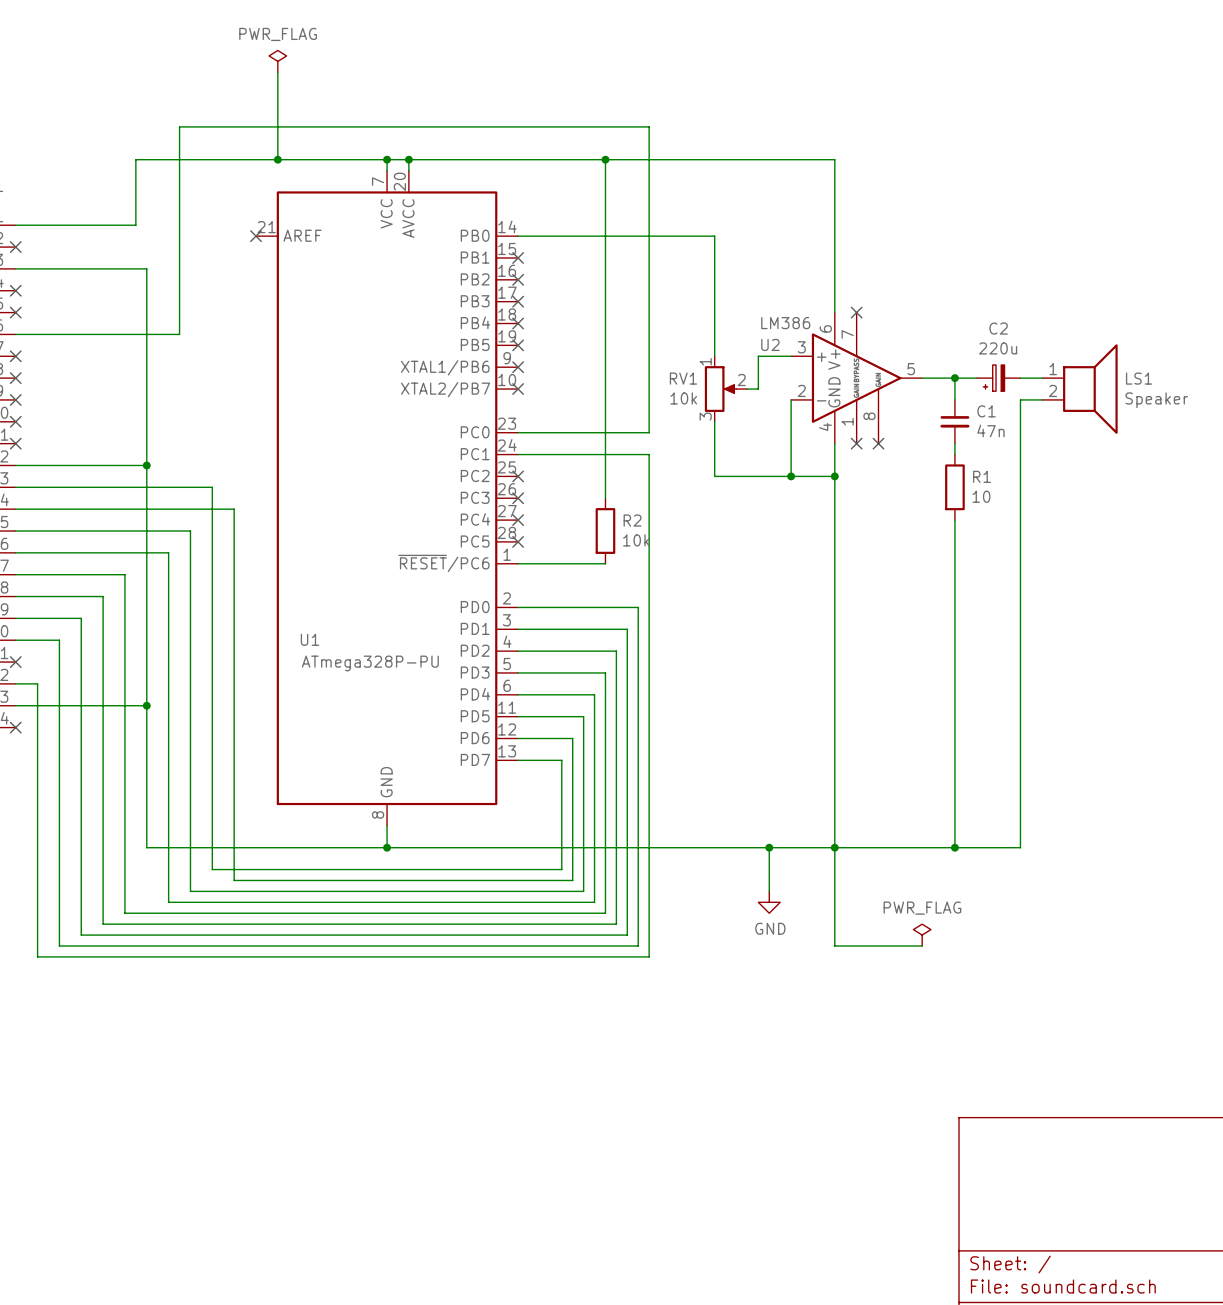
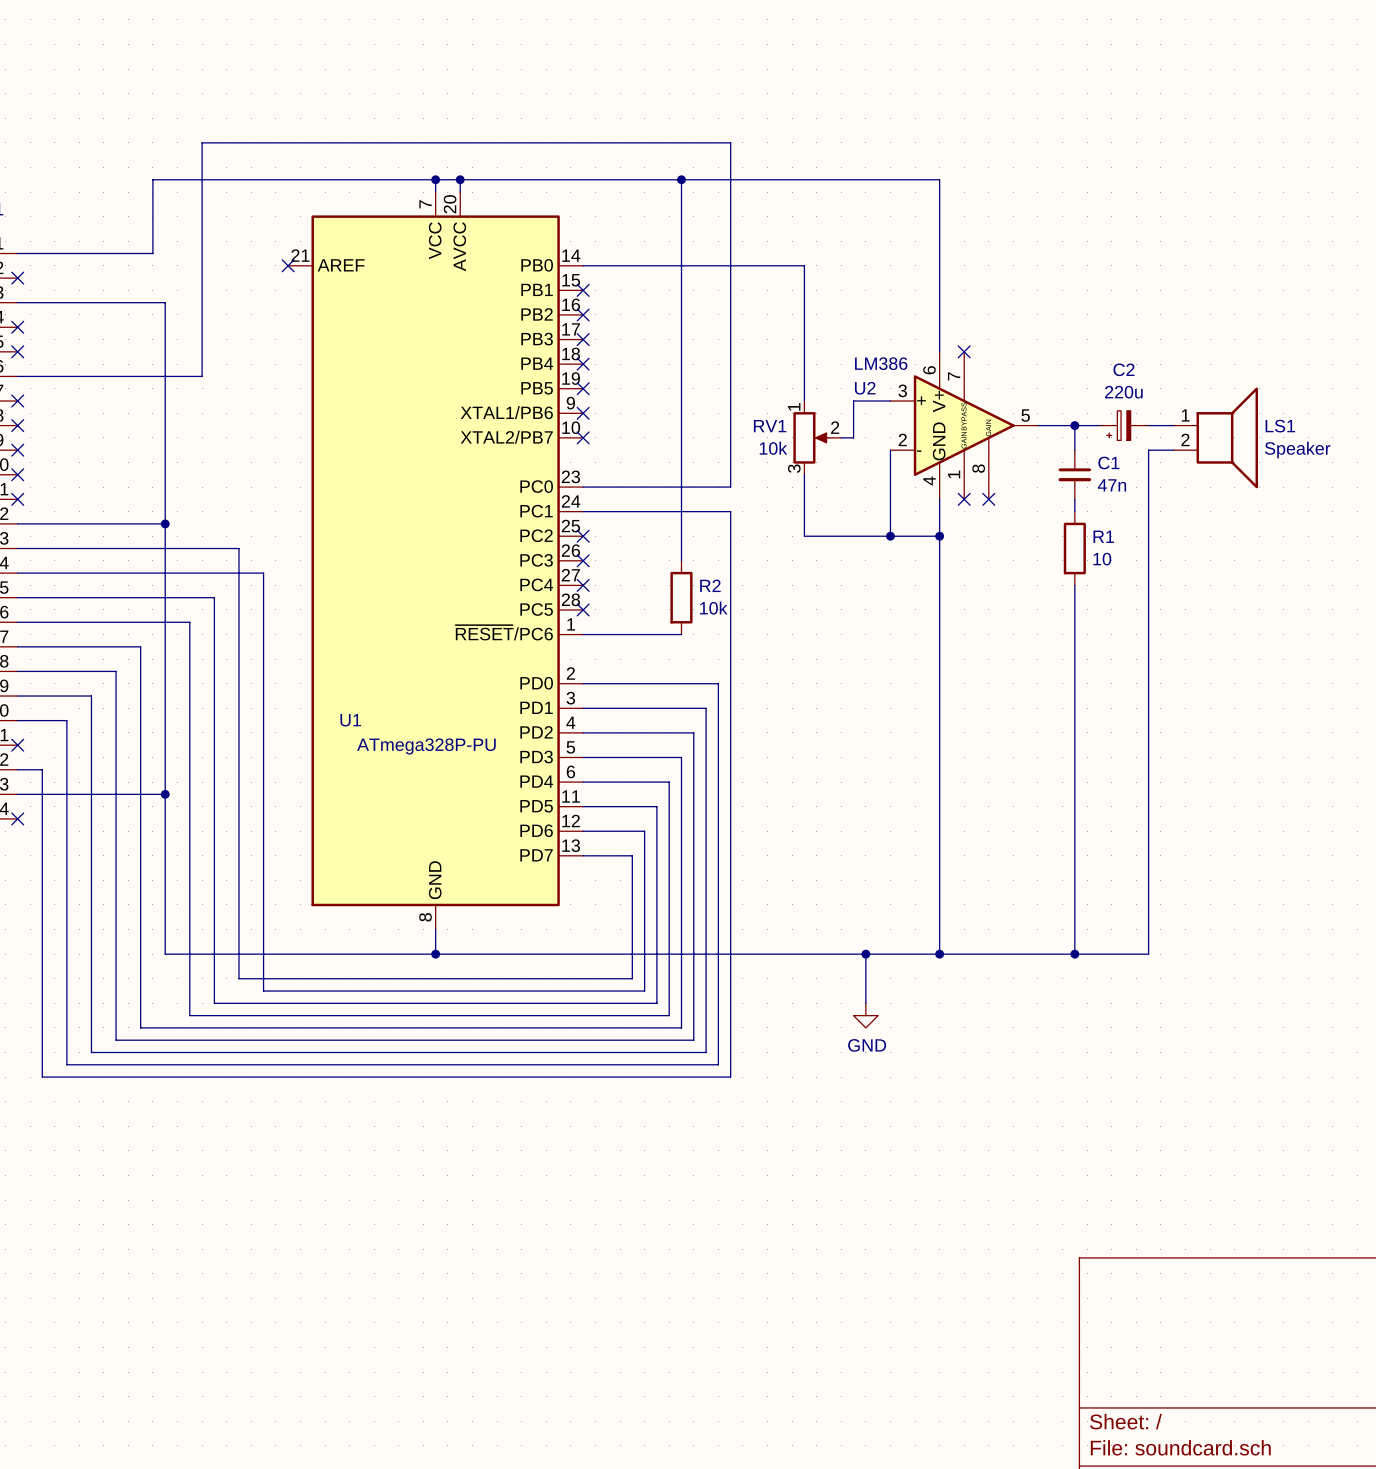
power symbol: PWR_FLAG (277, 61) -> none
wire: (277, 72) (277, 159) -> none
junction: (277, 159) -> none
wire: (834, 847) (834, 946) (922, 946) -> none
power symbol: PWR_FLAG (922, 935) -> none

